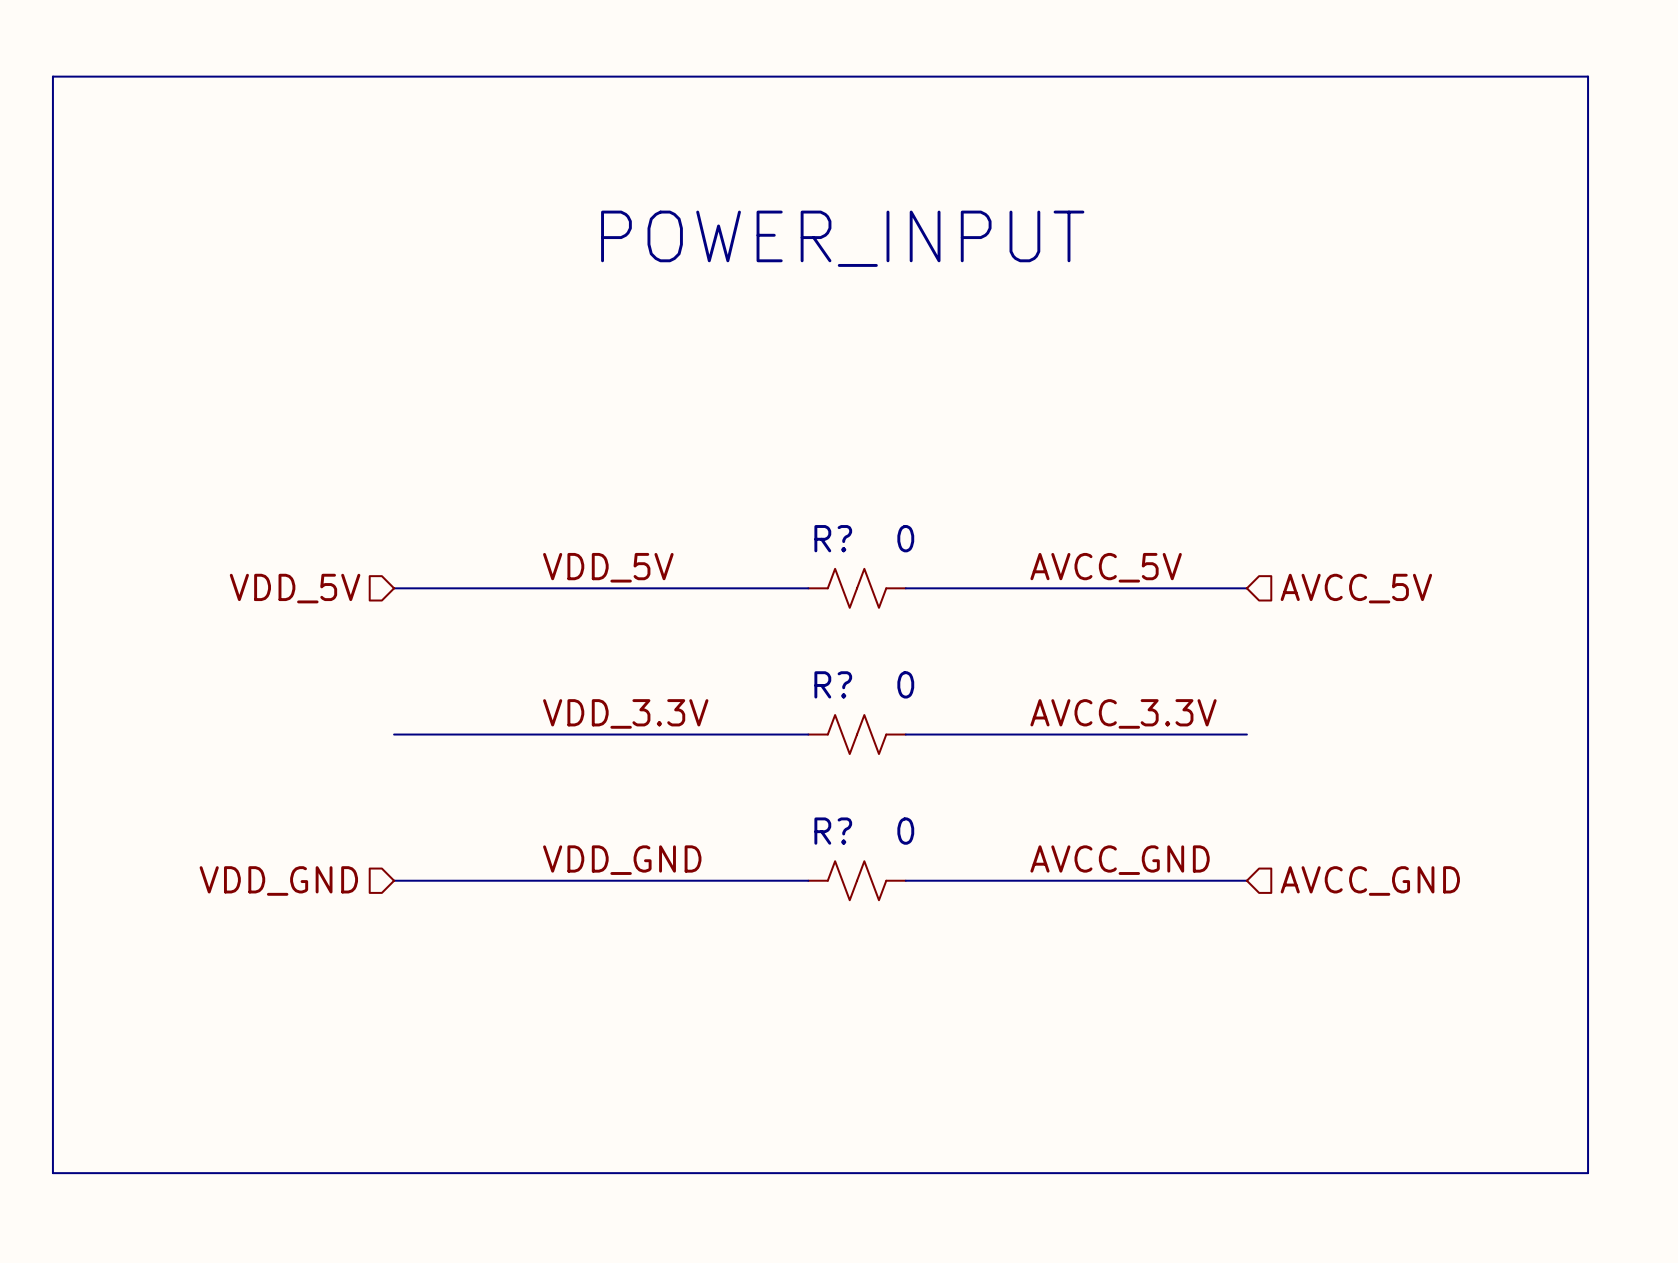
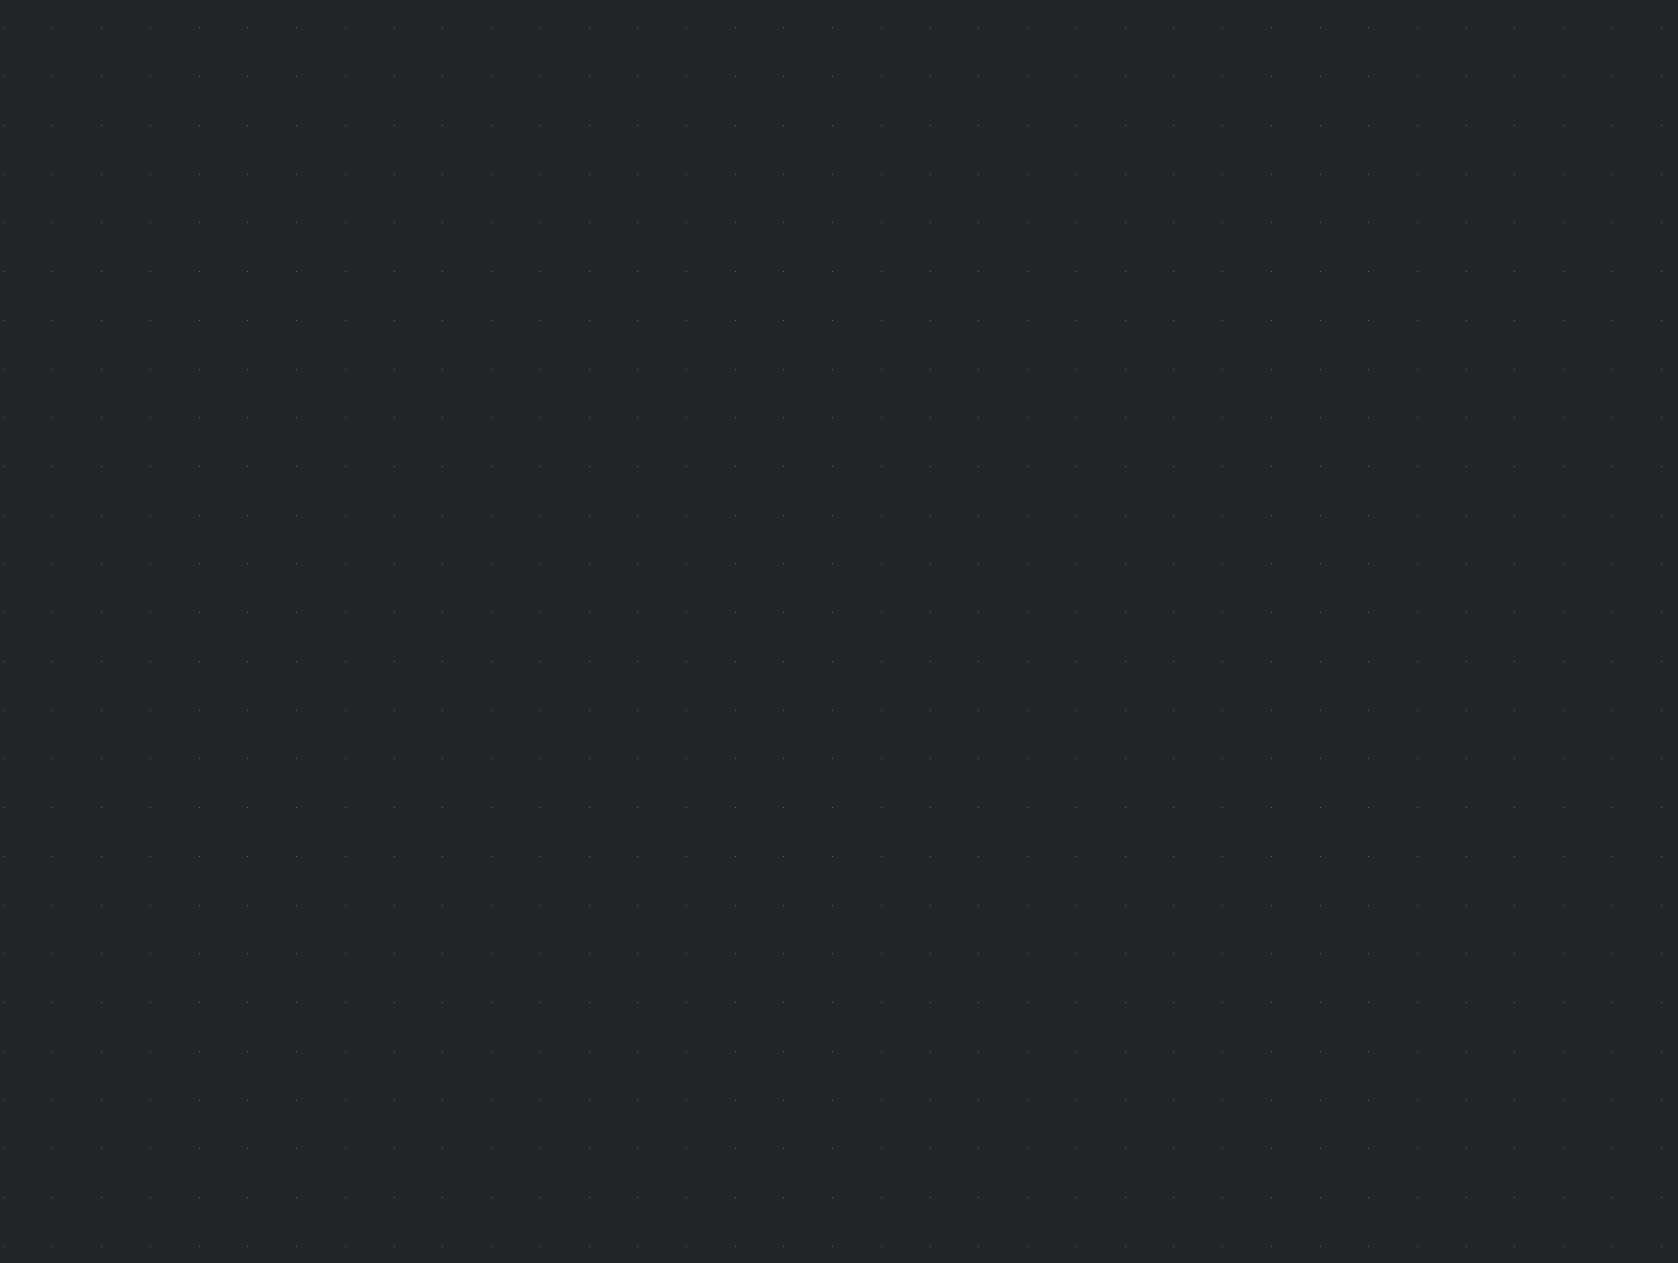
line: (52, 76) (1588, 76) (1588, 1173) (52, 1173) (52, 76) -> none
text: POWER_INPUT (842, 238) -> none
label: VDD_5V (608, 567) -> none
label: AVCC_5V (1106, 567) -> none
hierarchical label: VDD_5V (295, 588) -> none
wire: (394, 588) (808, 588) -> none
R?: 0 (857, 588) -> none
wire: (905, 588) (1246, 588) -> none
hierarchical label: AVCC_5V (1356, 588) -> none
label: VDD_3.3V (625, 713) -> none
label: AVCC_3.3V (1123, 713) -> none
wire: (394, 734) (808, 734) -> none
R?: 0 (857, 734) -> none
wire: (905, 734) (1246, 734) -> none
label: VDD_GND (622, 860) -> none
label: AVCC_GND (1120, 860) -> none
hierarchical label: VDD_GND (278, 880) -> none
wire: (394, 880) (808, 880) -> none
R?: 0 (857, 880) -> none
wire: (905, 880) (1246, 880) -> none
hierarchical label: AVCC_GND (1370, 880) -> none

